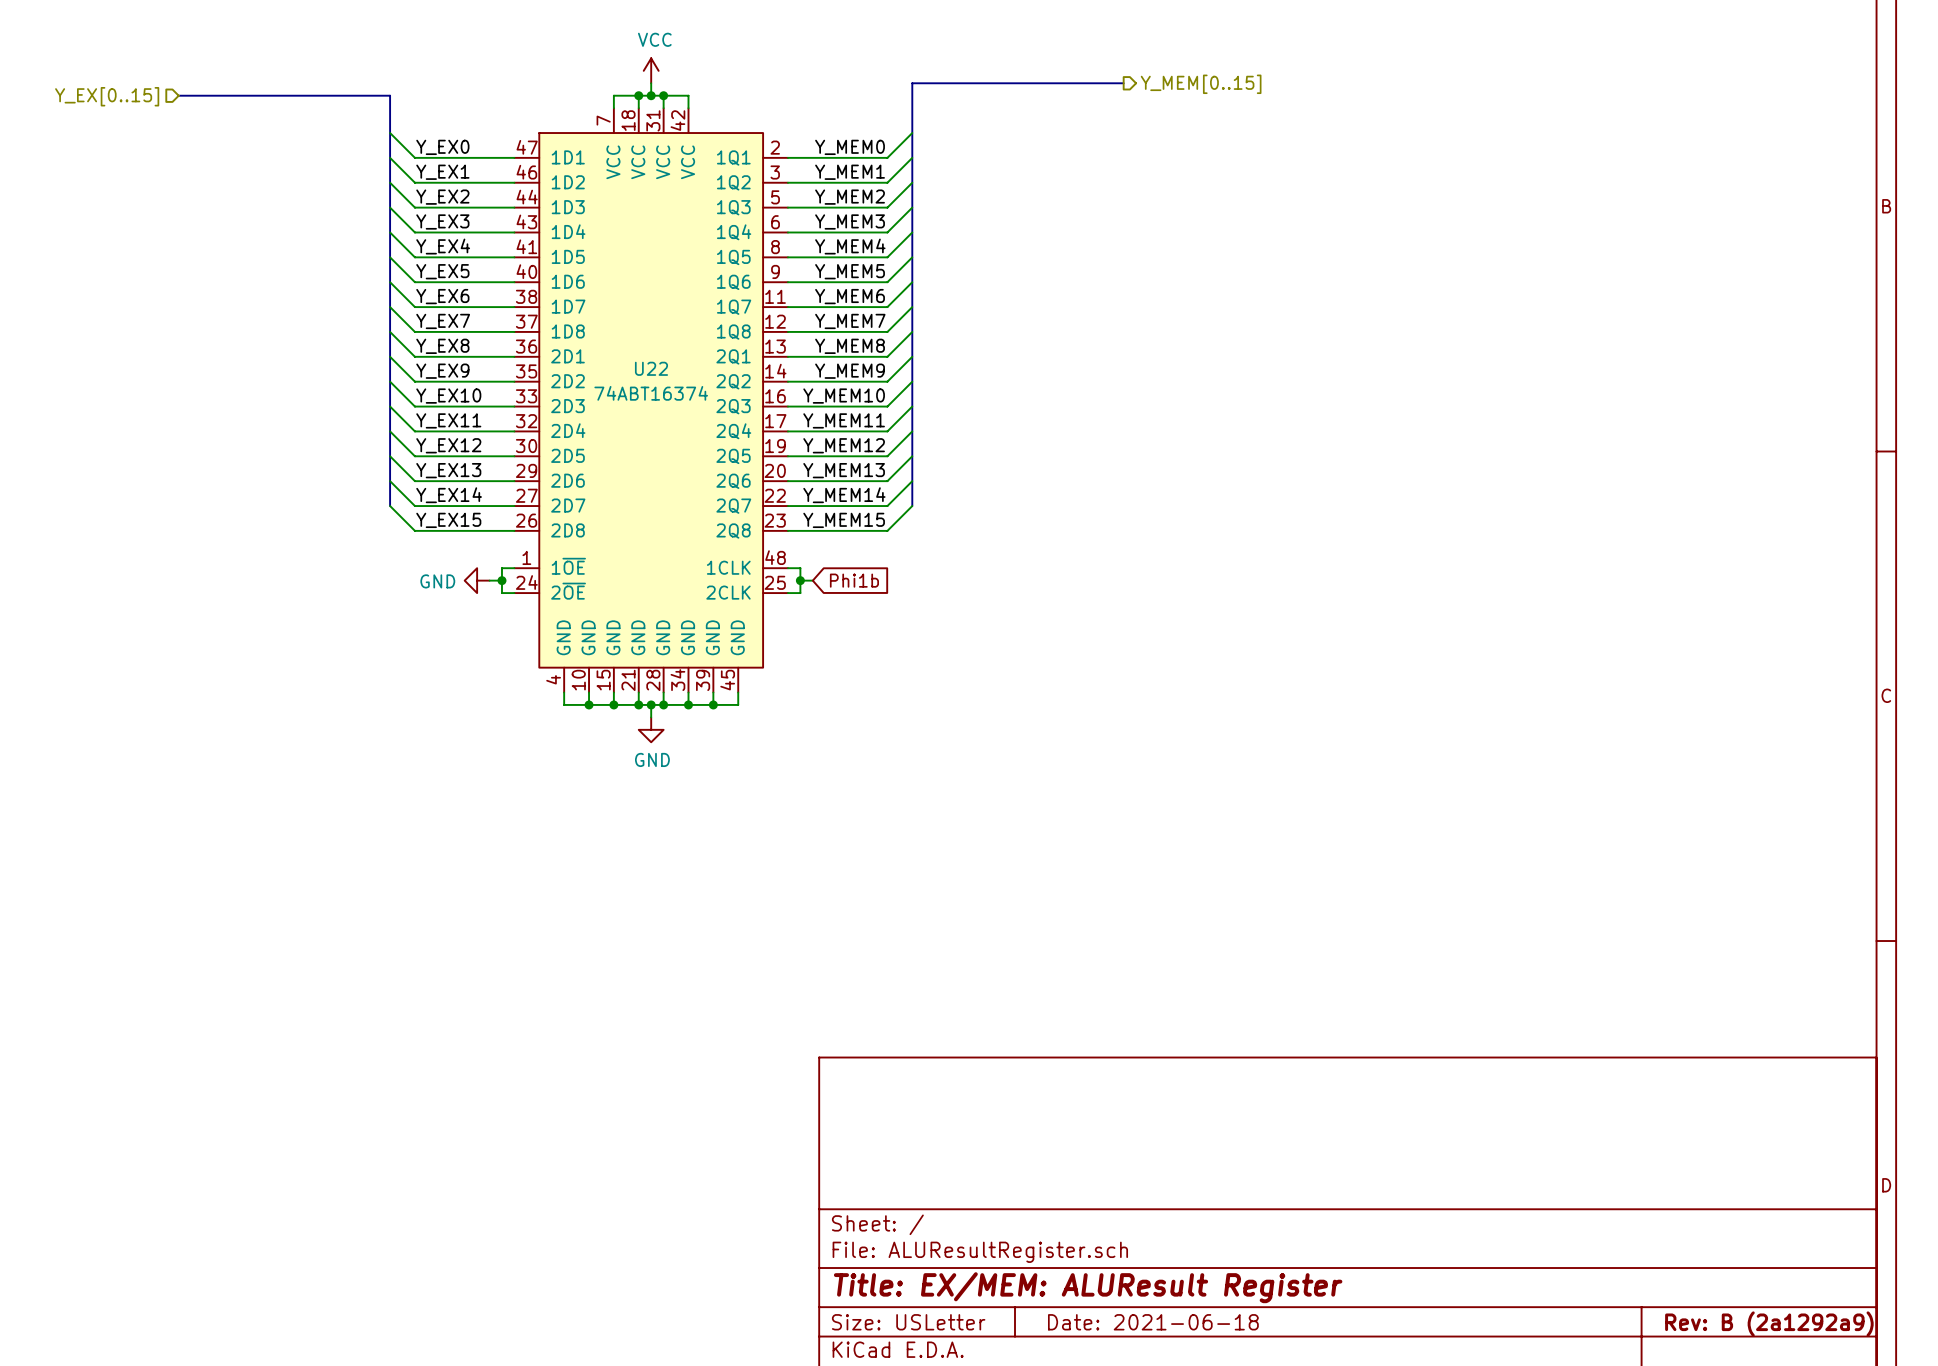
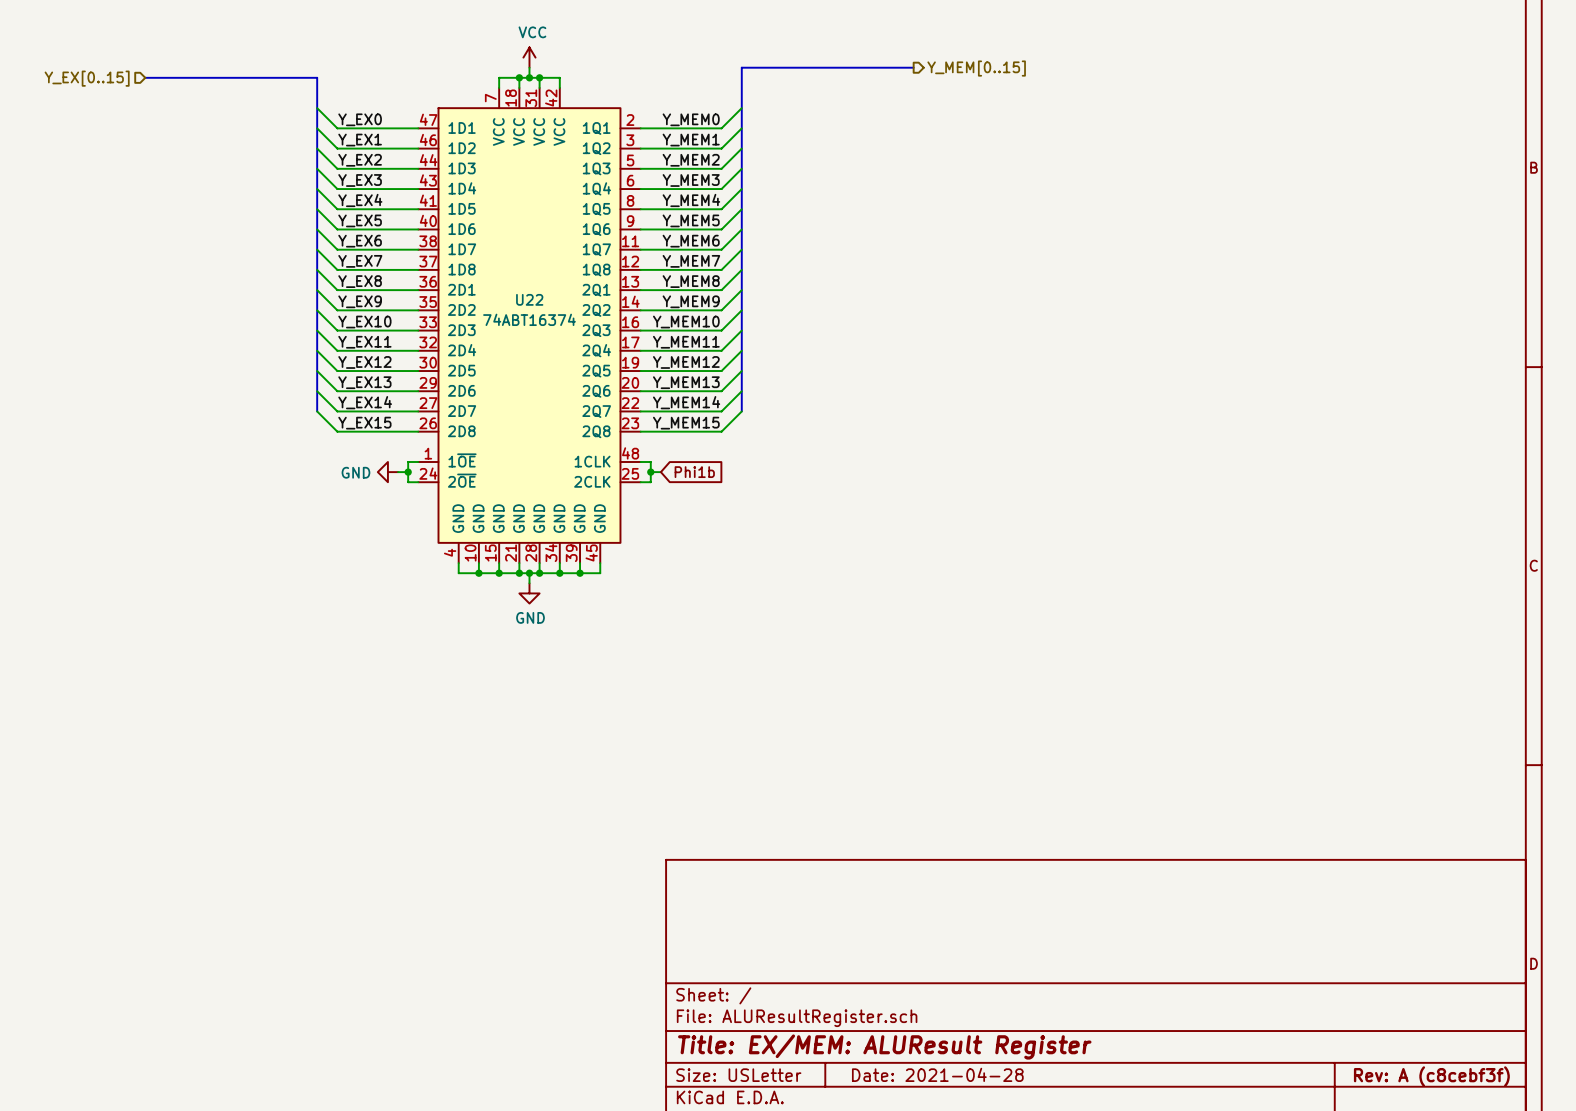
title block: Date: 2021-06-18 (1153, 1322) -> Date: 2021-04-28 (937, 1074)
title block: Rev: B (2a1292a9) (1769, 1324) -> Rev: A (c8cebf3f) (1431, 1076)

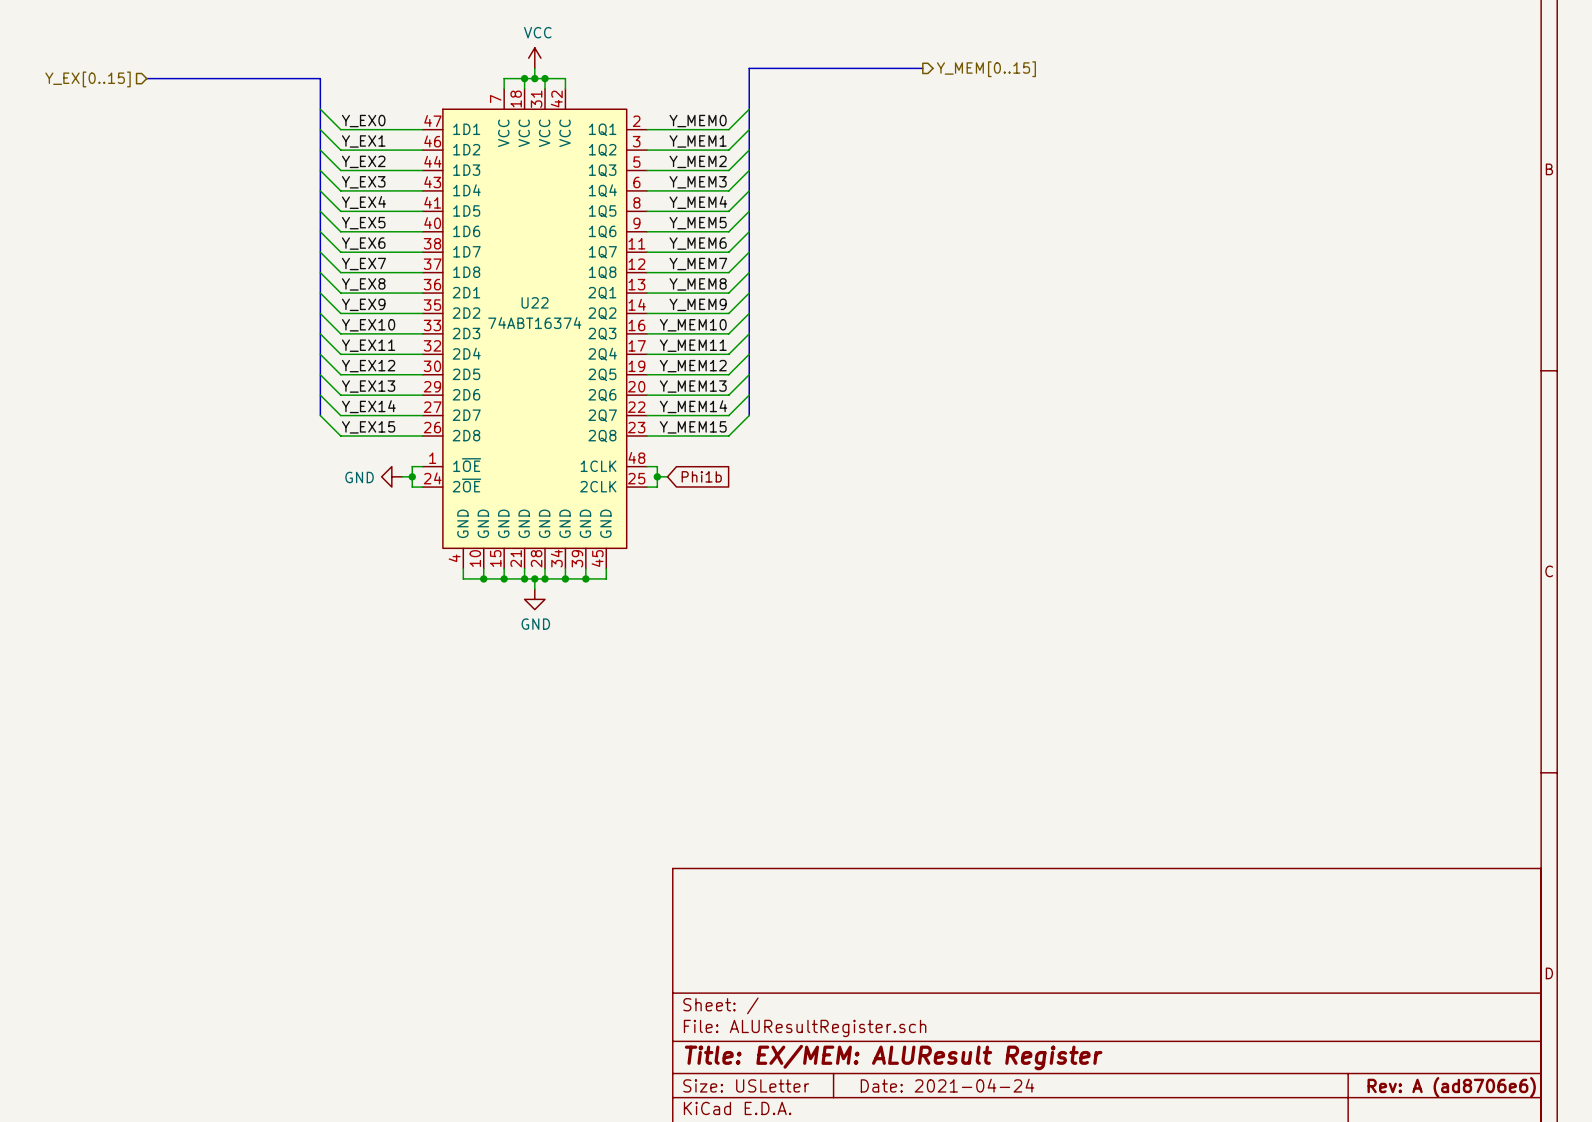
title block: Date: 2021-04-28 (937, 1074) -> Date: 2021-04-24 (947, 1085)
title block: Rev: A (c8cebf3f) (1431, 1076) -> Rev: A (ad8706e6) (1451, 1087)

